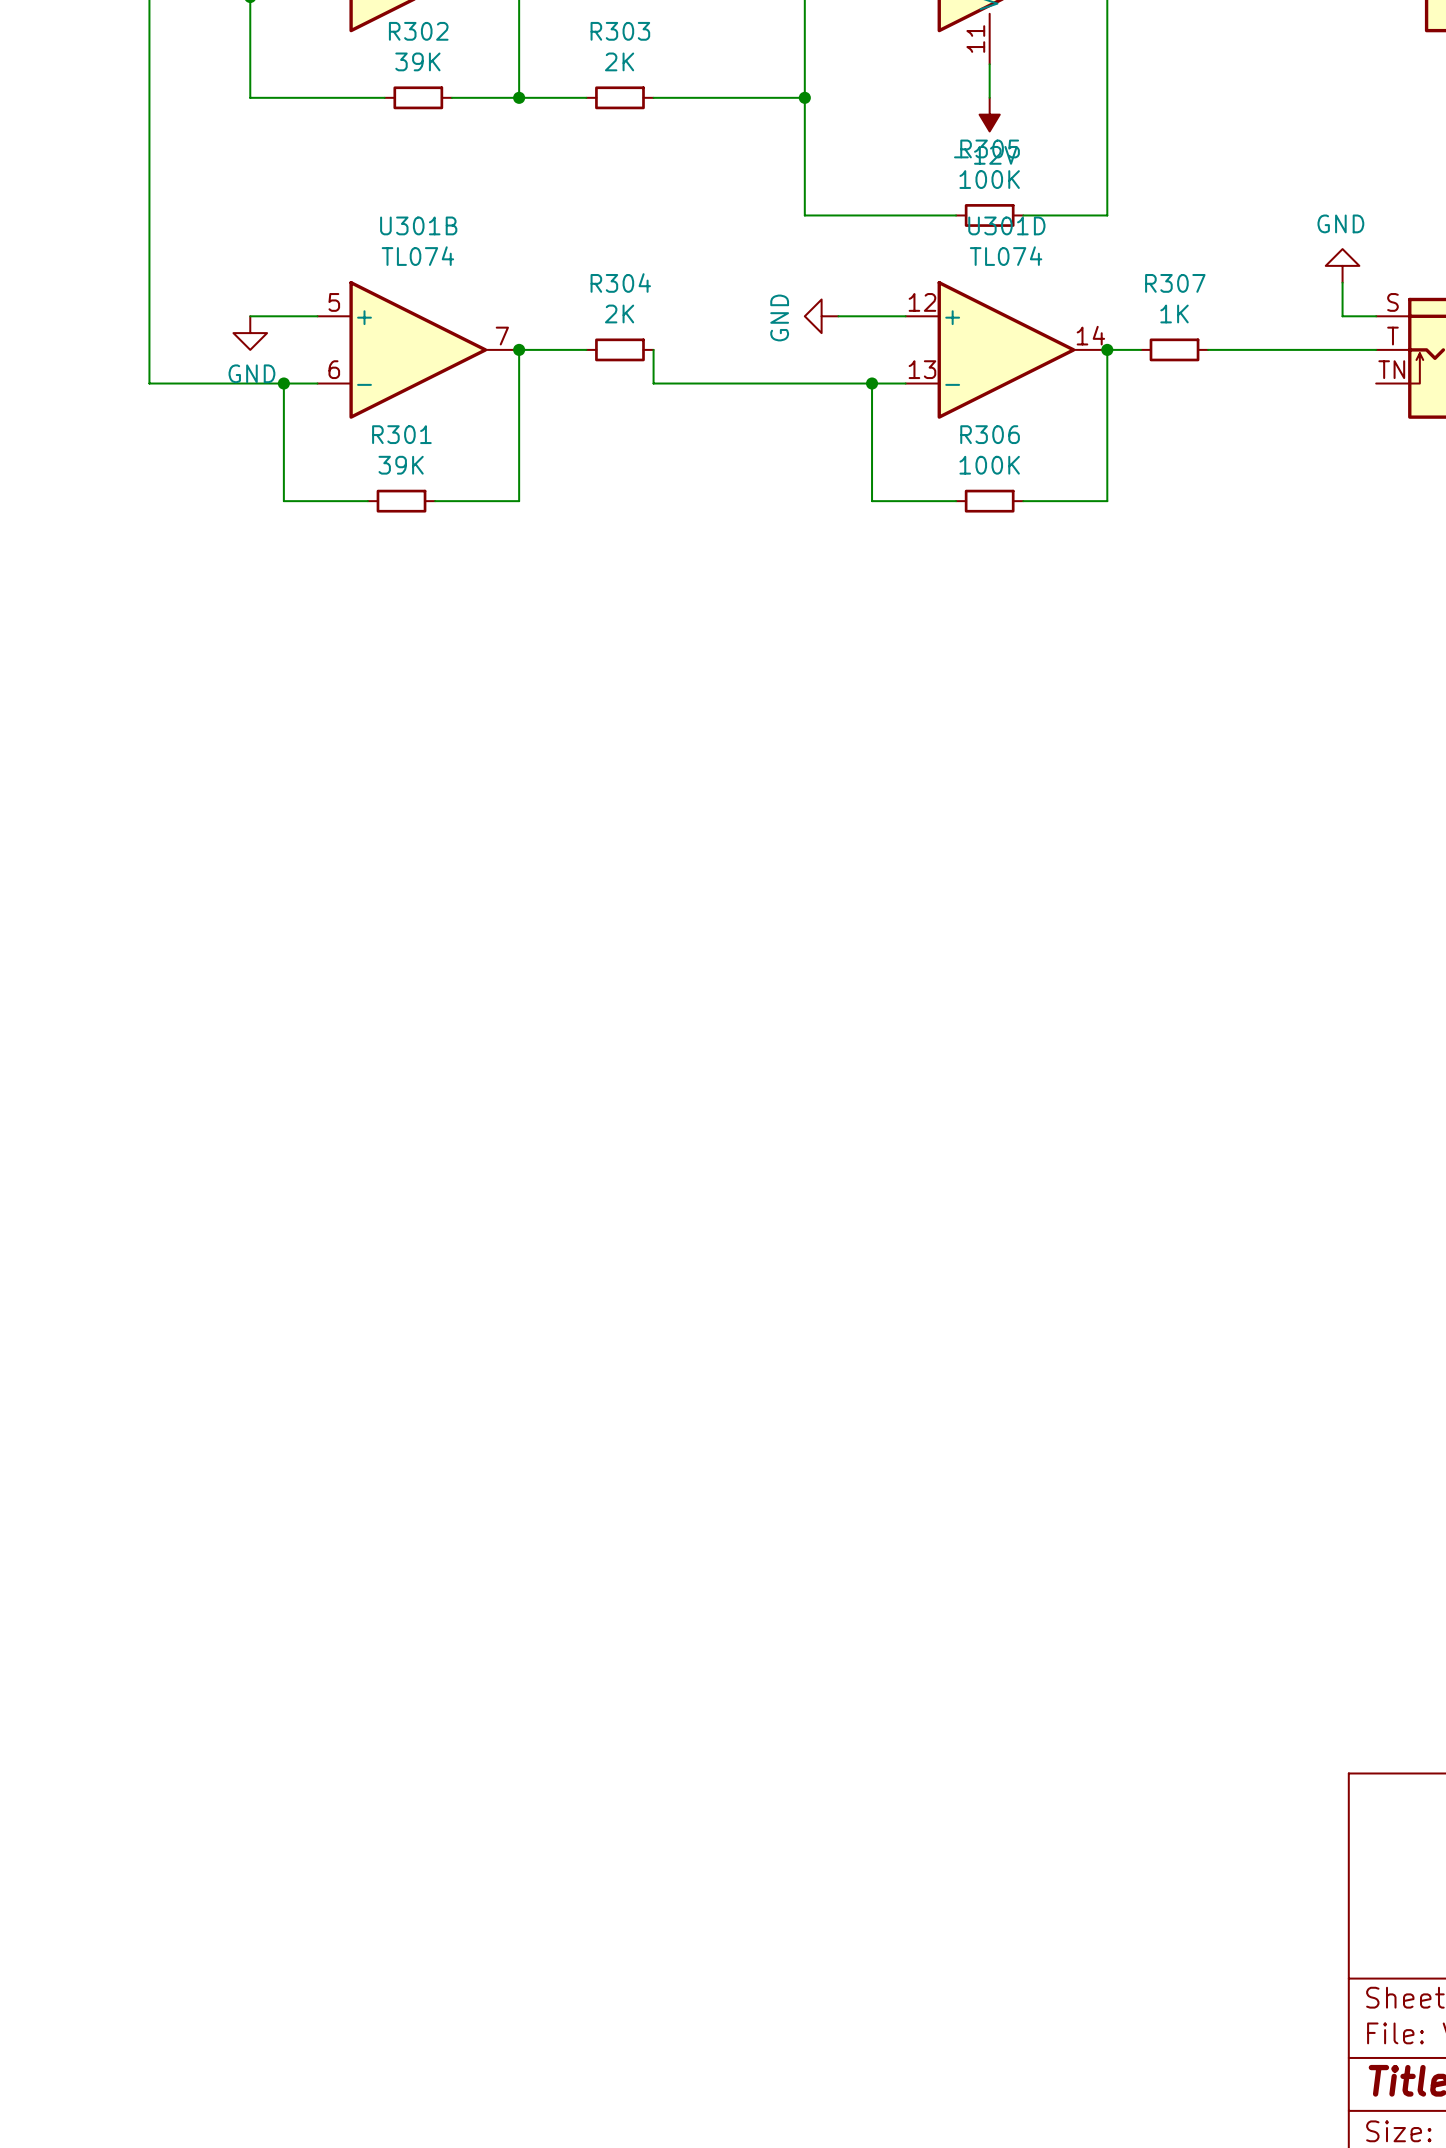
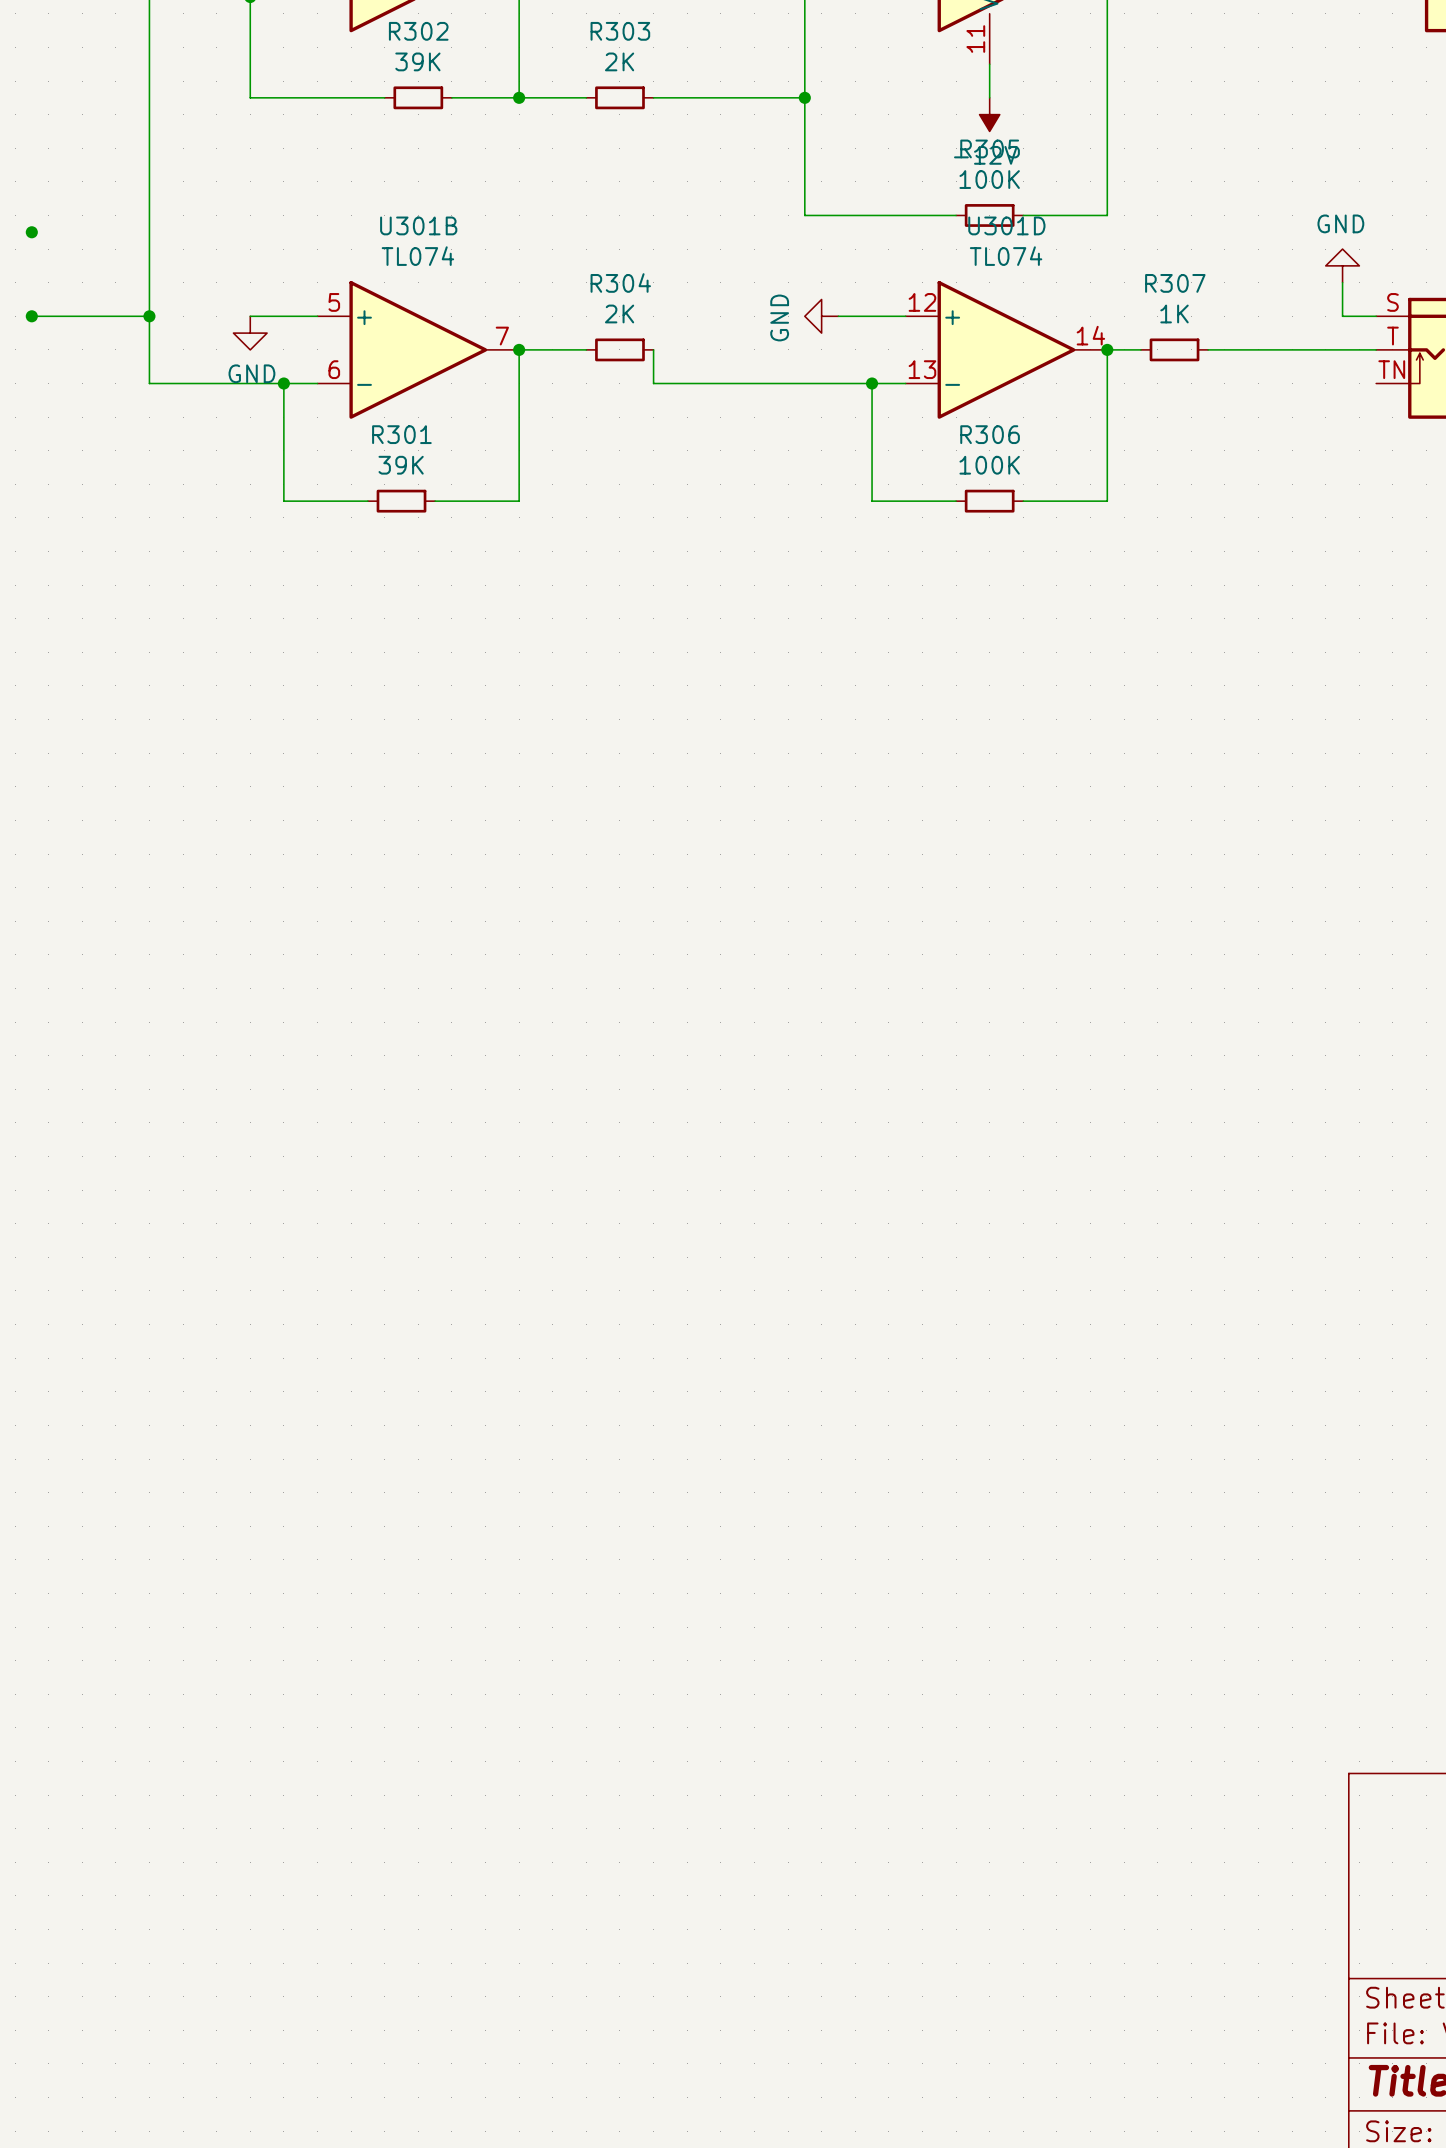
junction: none -> (31, 232)
wire: none -> (31, 316) (149, 316)
junction: none -> (31, 316)
junction: none -> (149, 316)

